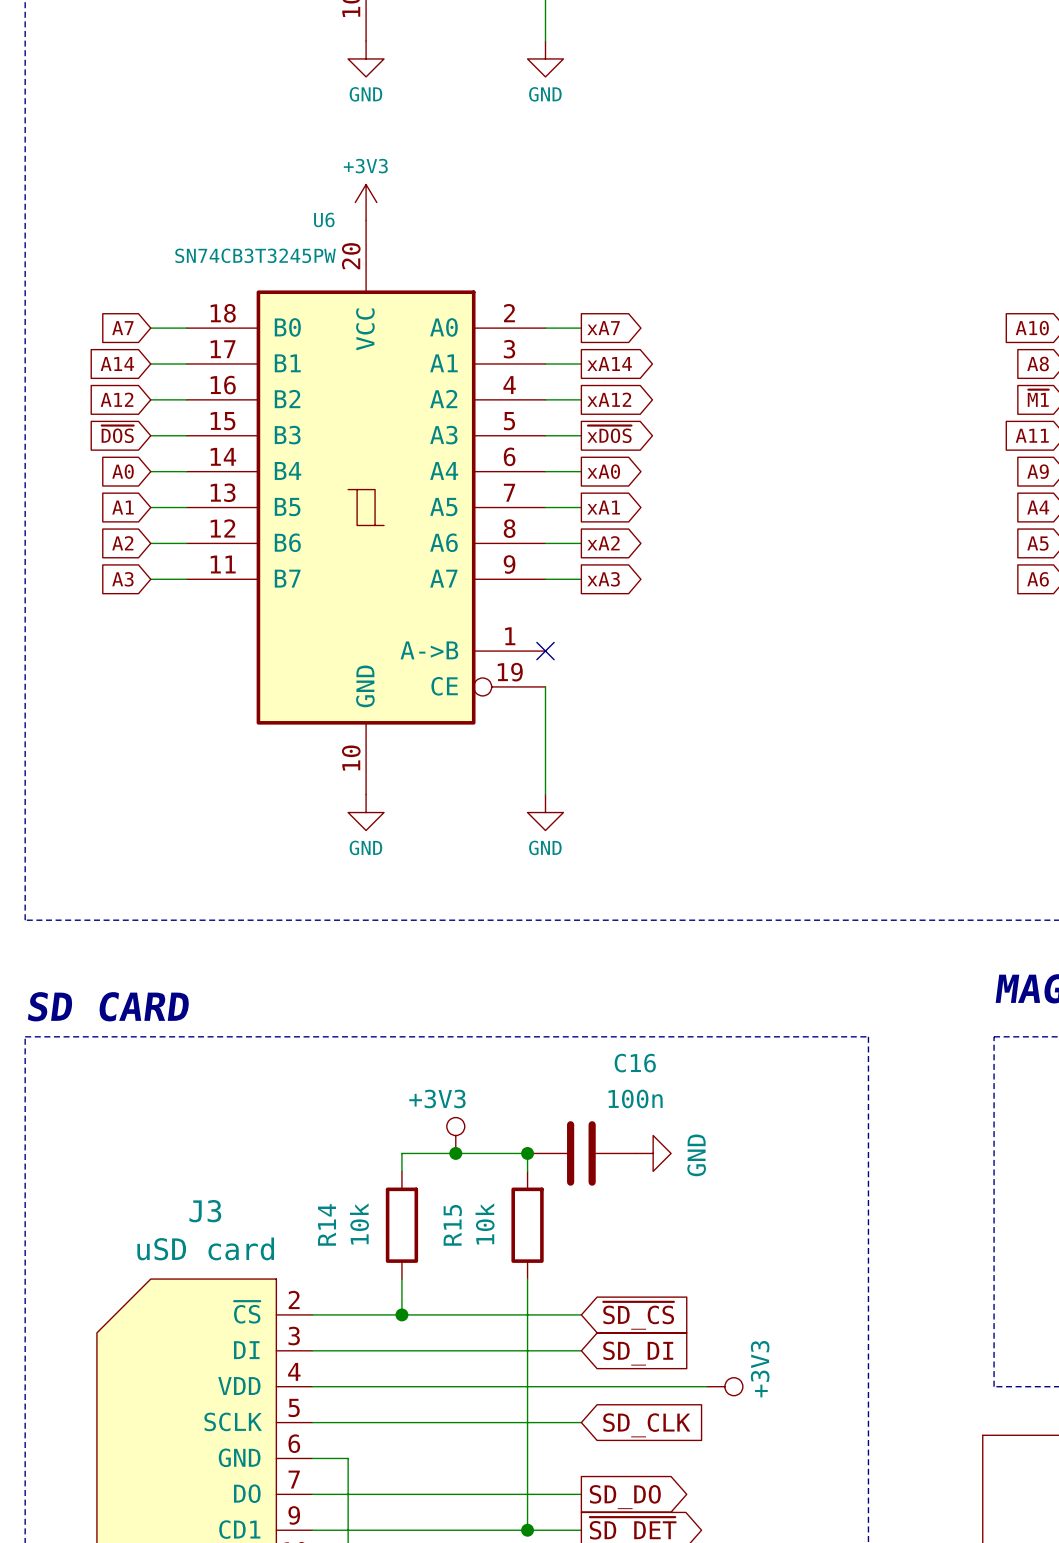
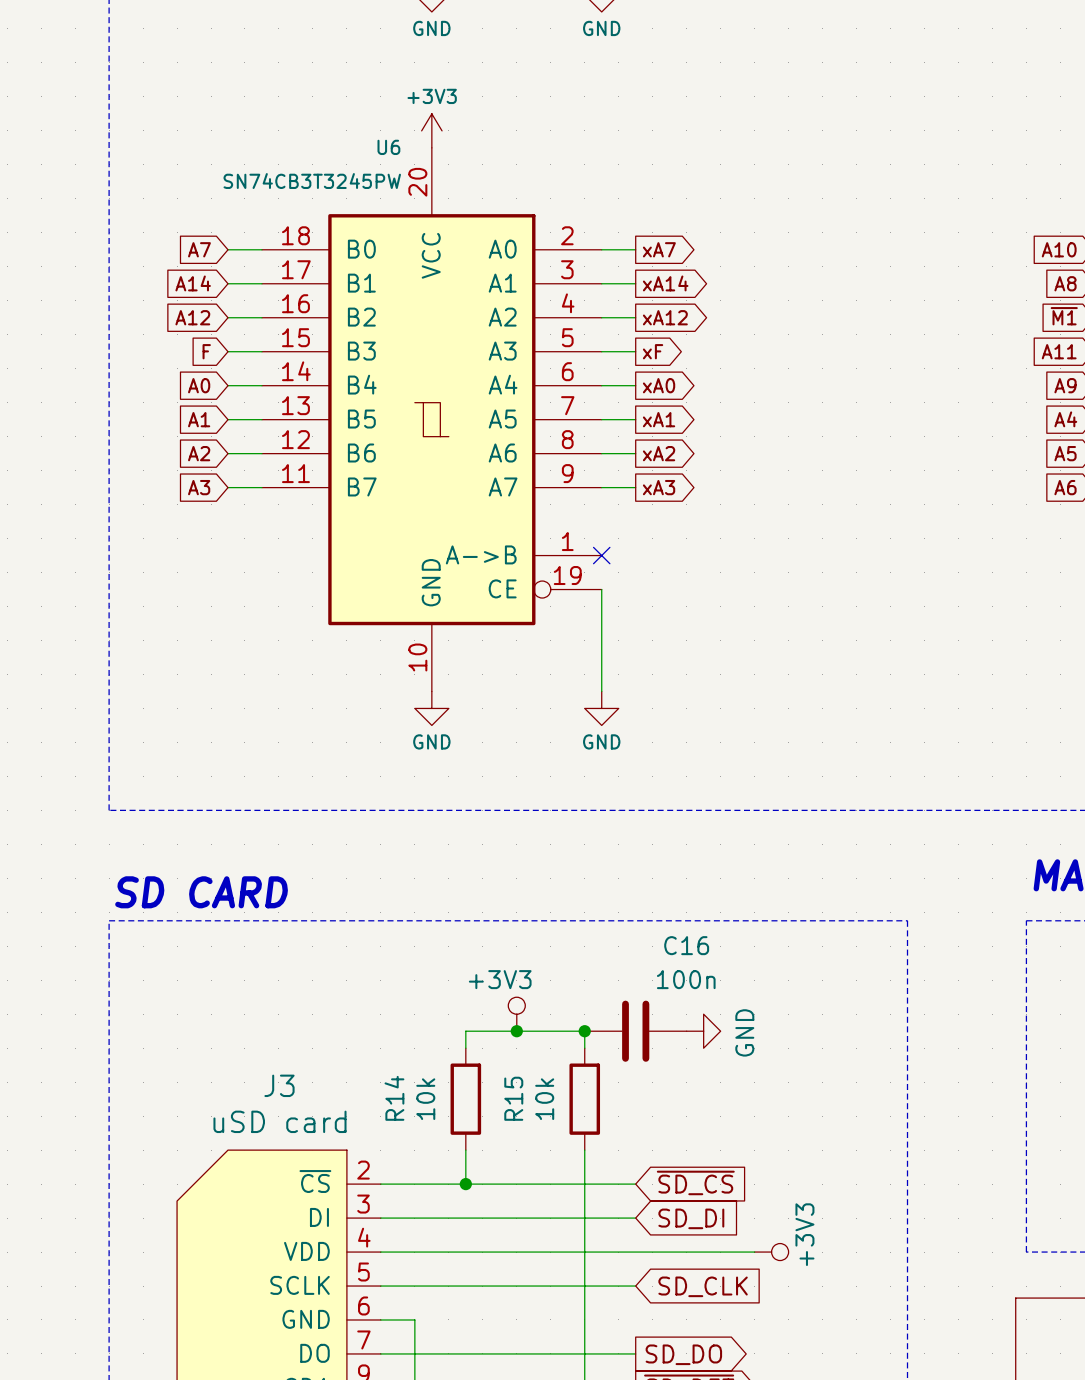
global label: ~{DOS} (117, 434) -> F (206, 351)
global label: ~{xDOS} (609, 434) -> xF (653, 351)

